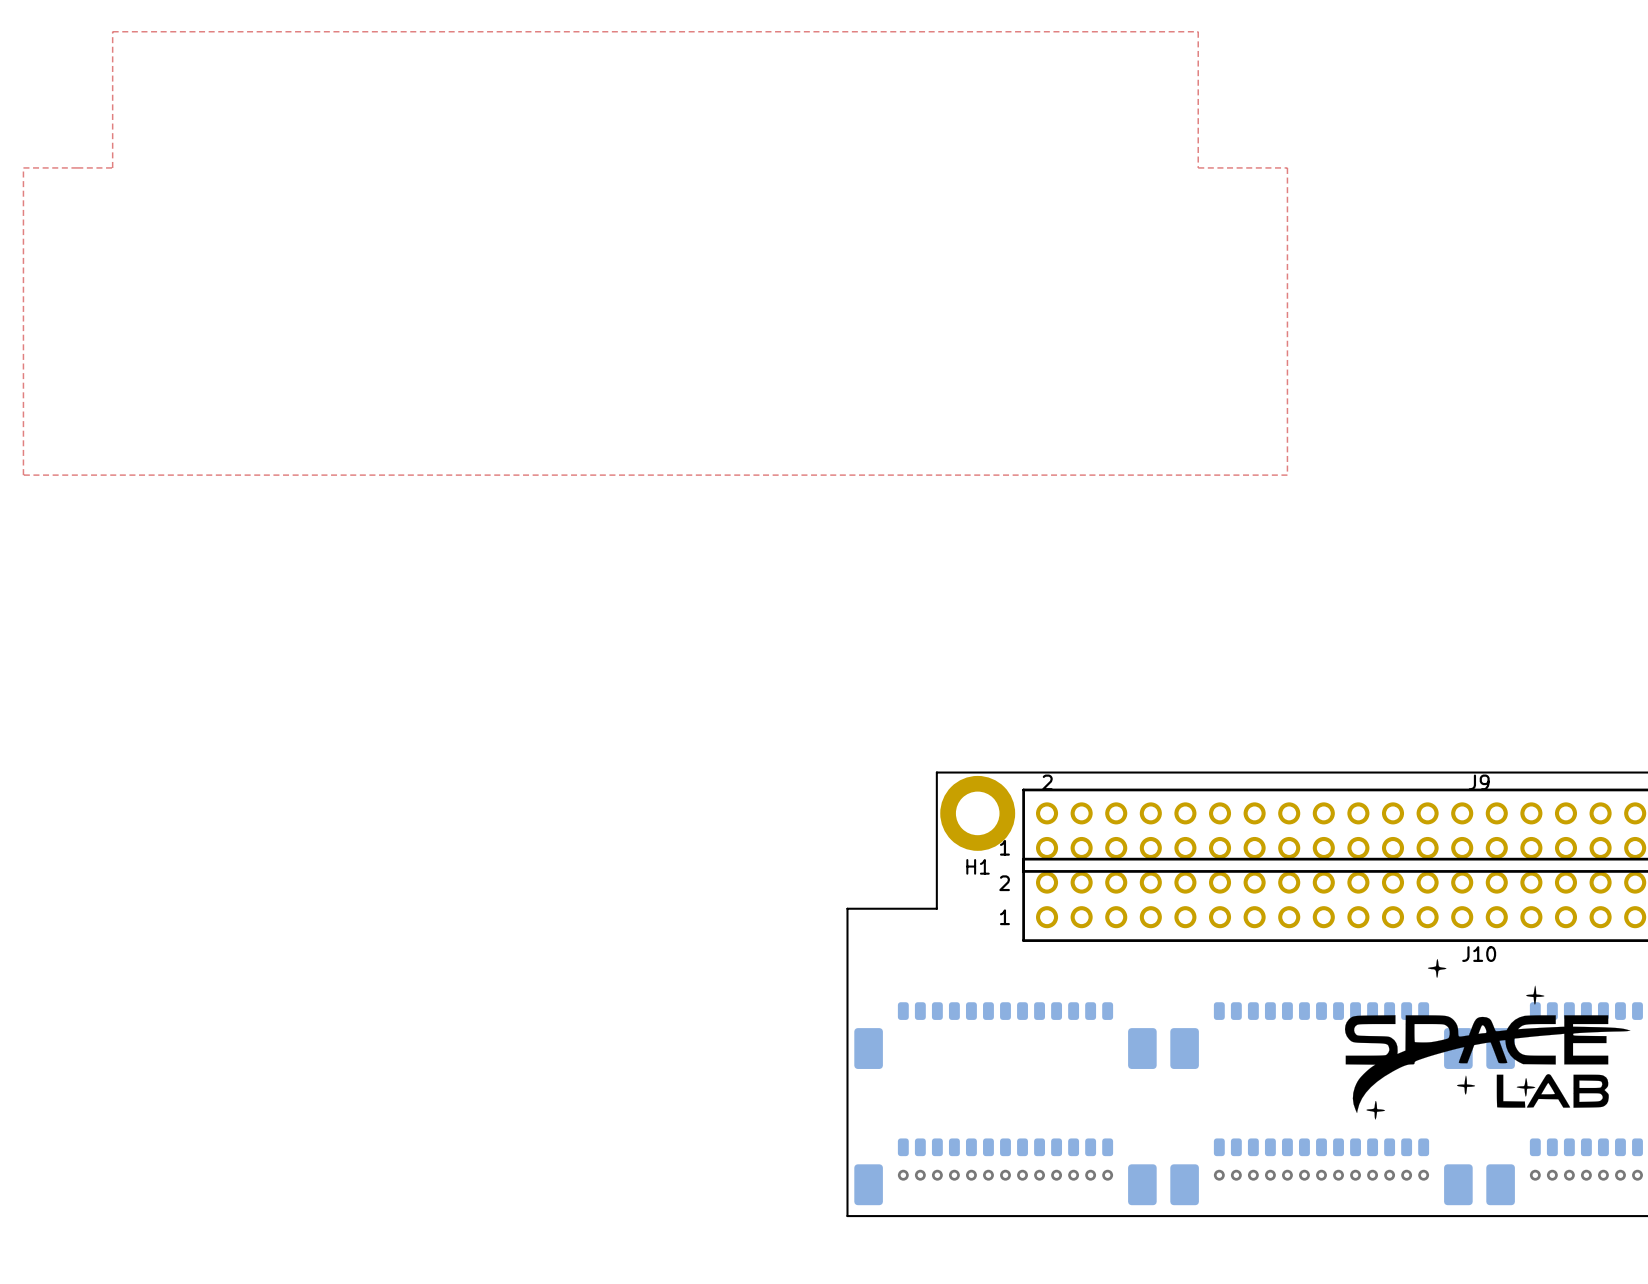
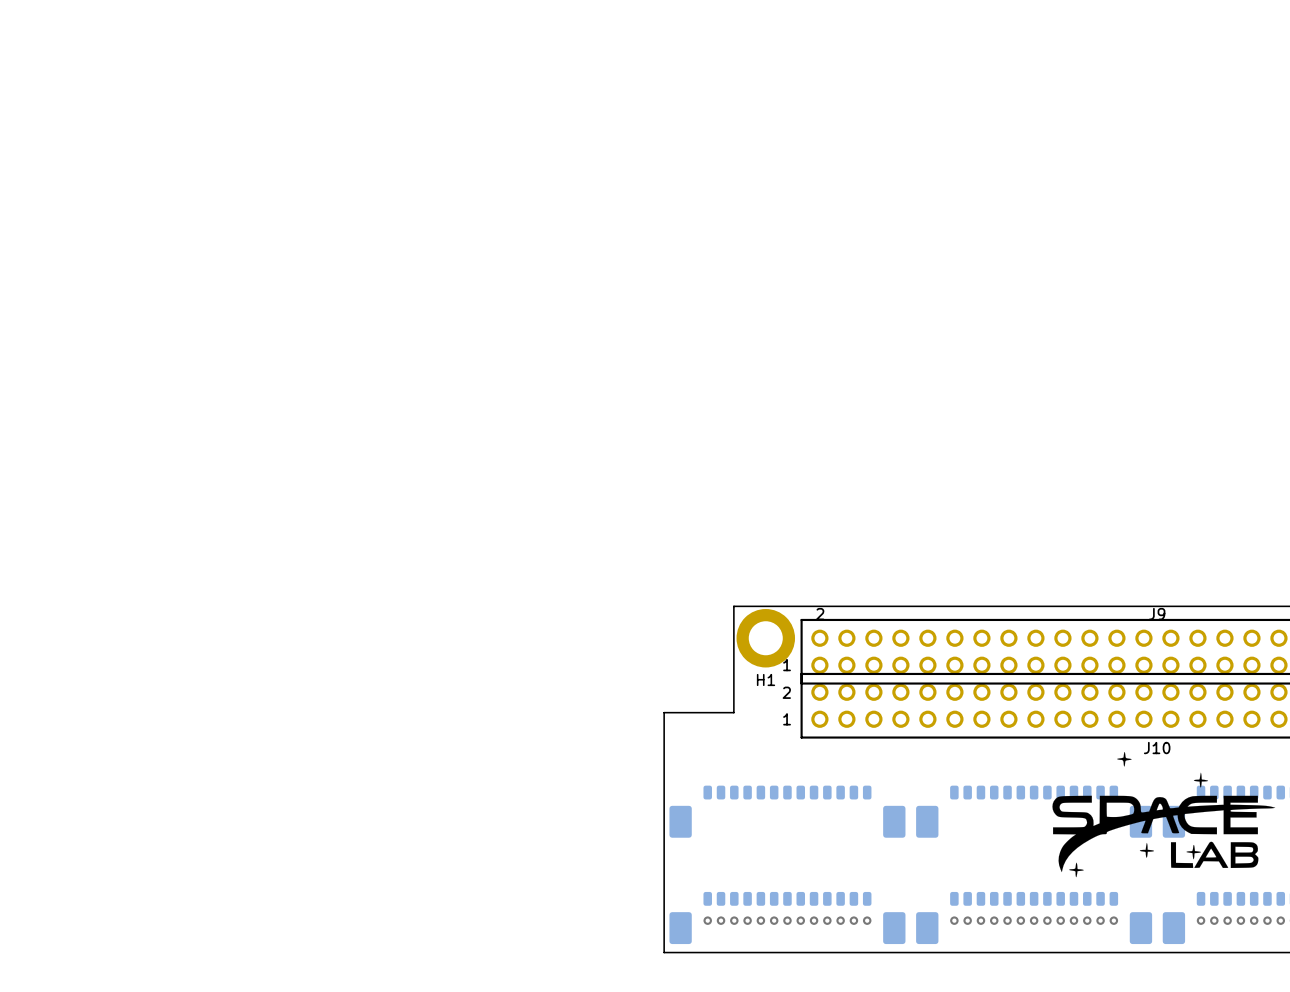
top zone outline: (112, 31) (112, 167) (23, 167) (23, 475) (1287, 475) (1287, 167) (1198, 167) (1198, 31) (112, 31) -> none

